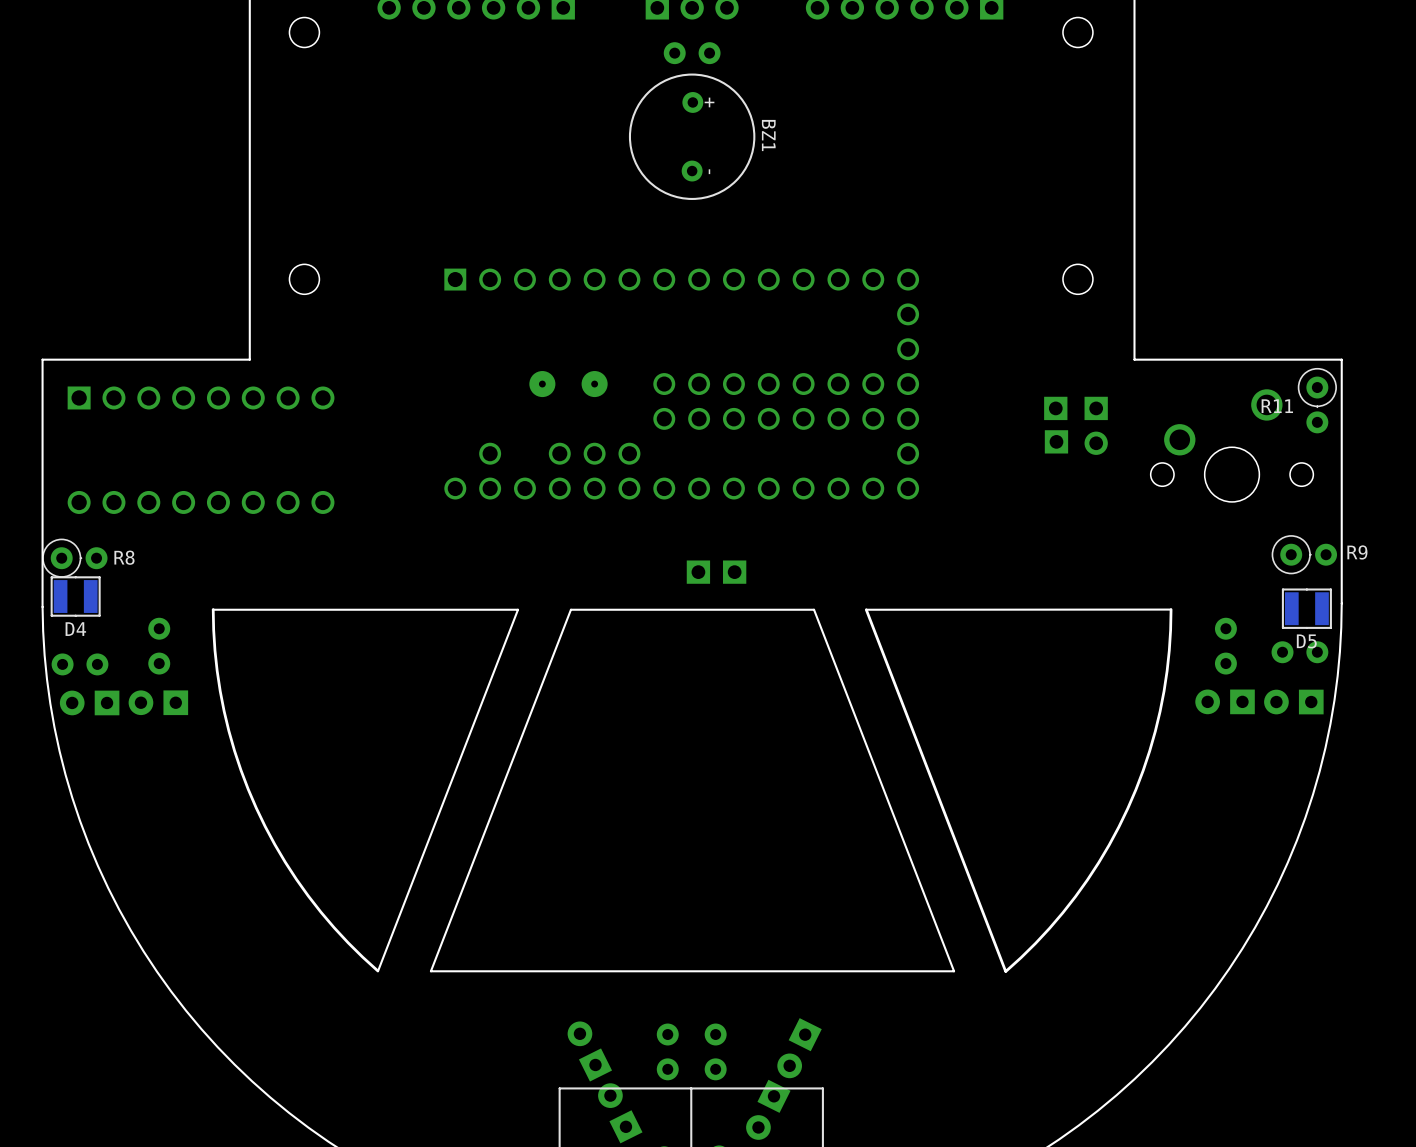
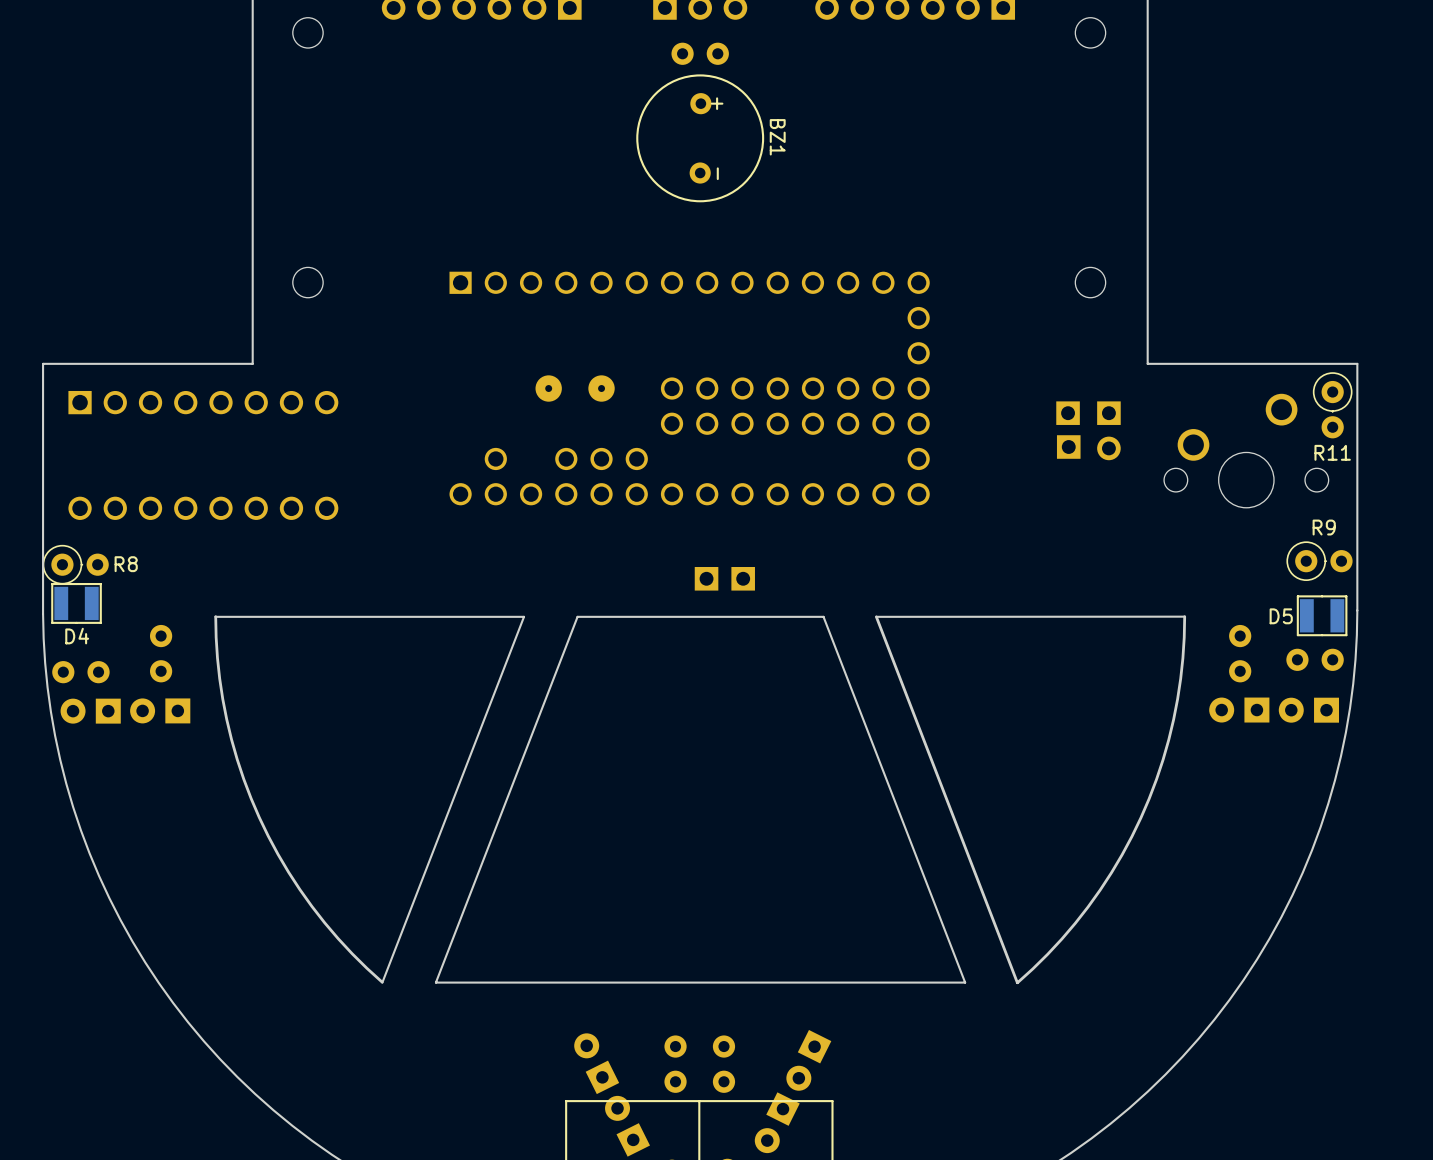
R11 name position: R11 (1277, 406) -> R11 (1332, 452)
R9 name position: R9 (1357, 552) -> R9 (1324, 527)
D5 name position: D5 (1306, 641) -> D5 (1281, 616)

